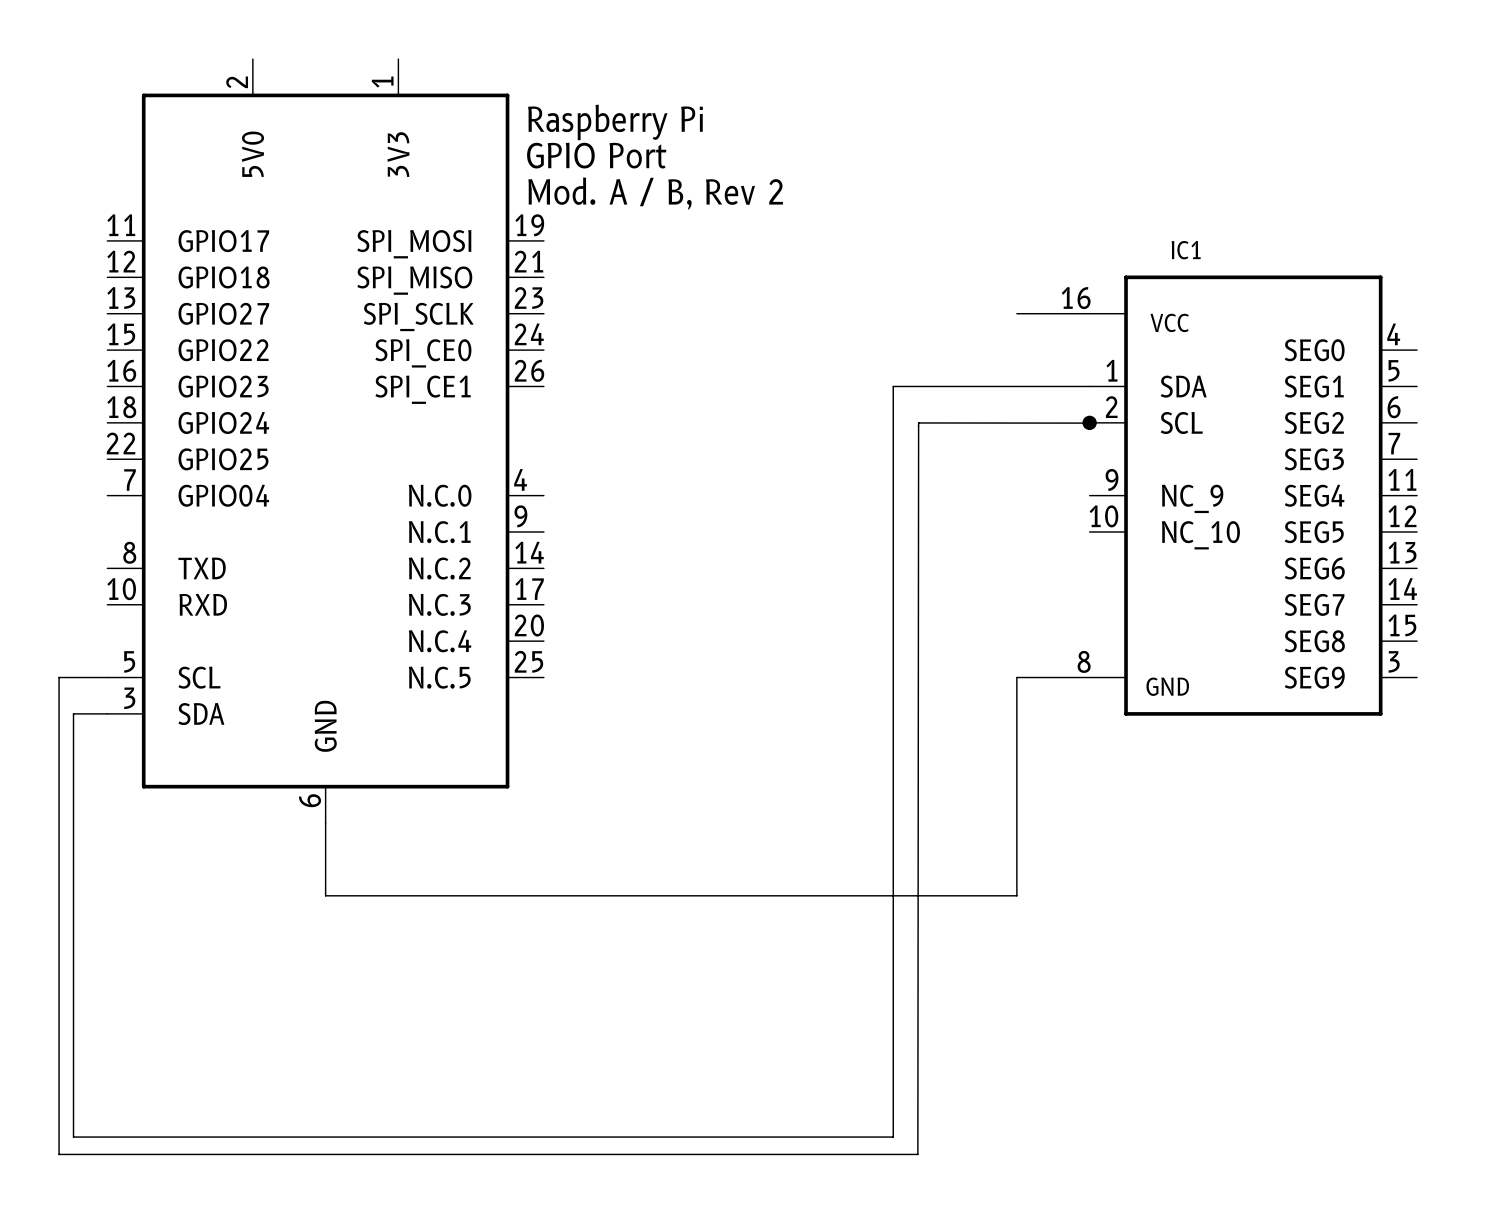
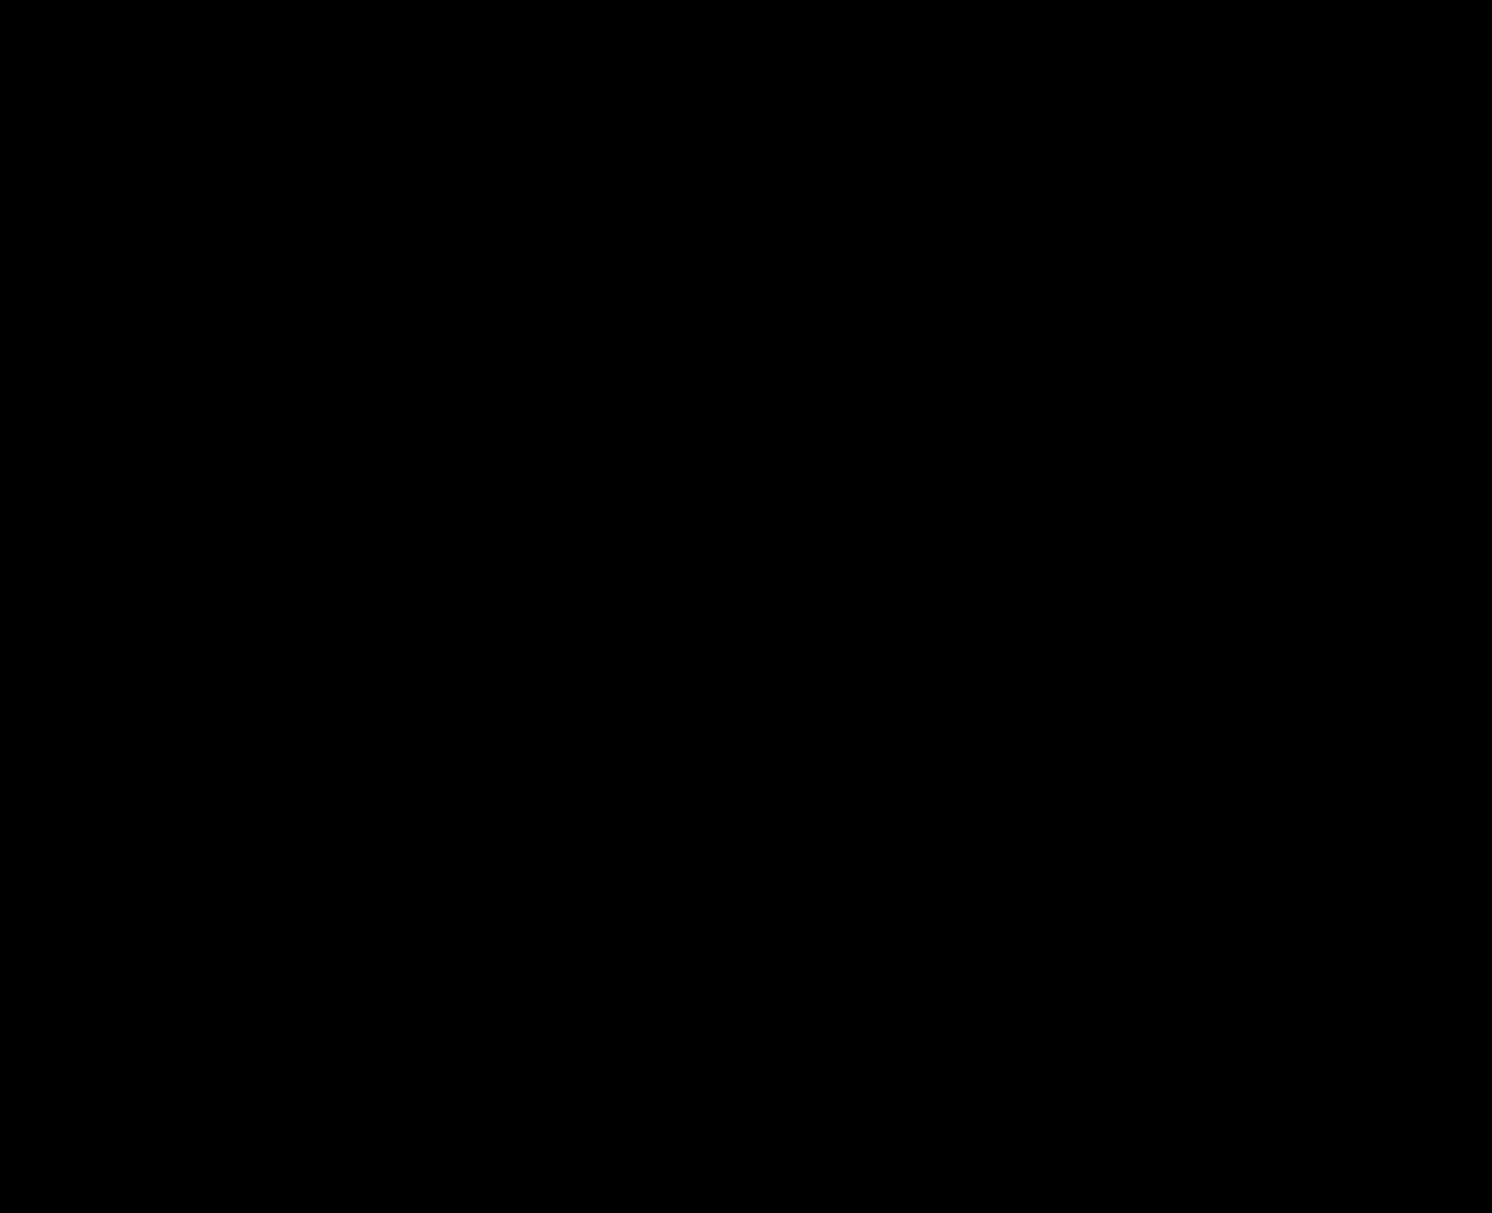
wire: (1089, 386) (893, 386) (893, 1137) (73, 1137) (73, 713) (107, 713) -> none
junction: (1089, 422) -> none
wire: (1089, 425) (1089, 422) (918, 422) (918, 426) -> none
wire: (918, 426) (917, 1154) (59, 1154) (59, 677) (107, 677) -> none
part: (325, 441) -> none
IC1: (1216, 495) -> none
wire: (1016, 677) (1016, 895) (325, 895) (325, 823) -> none

